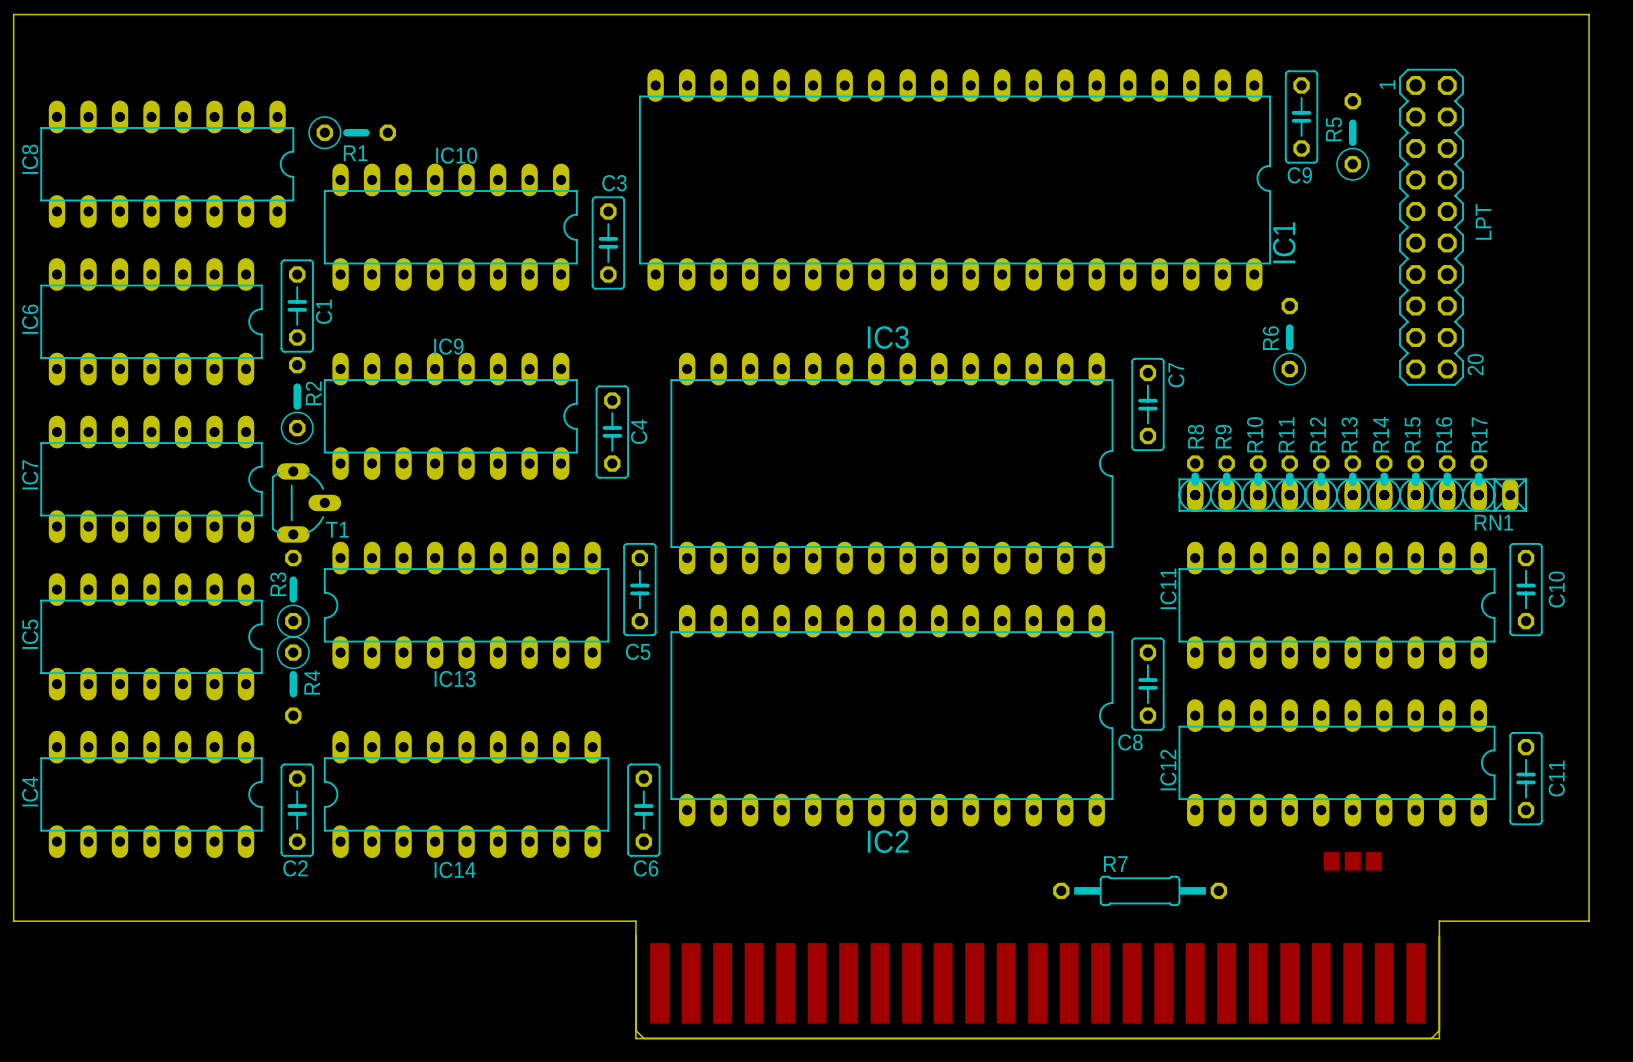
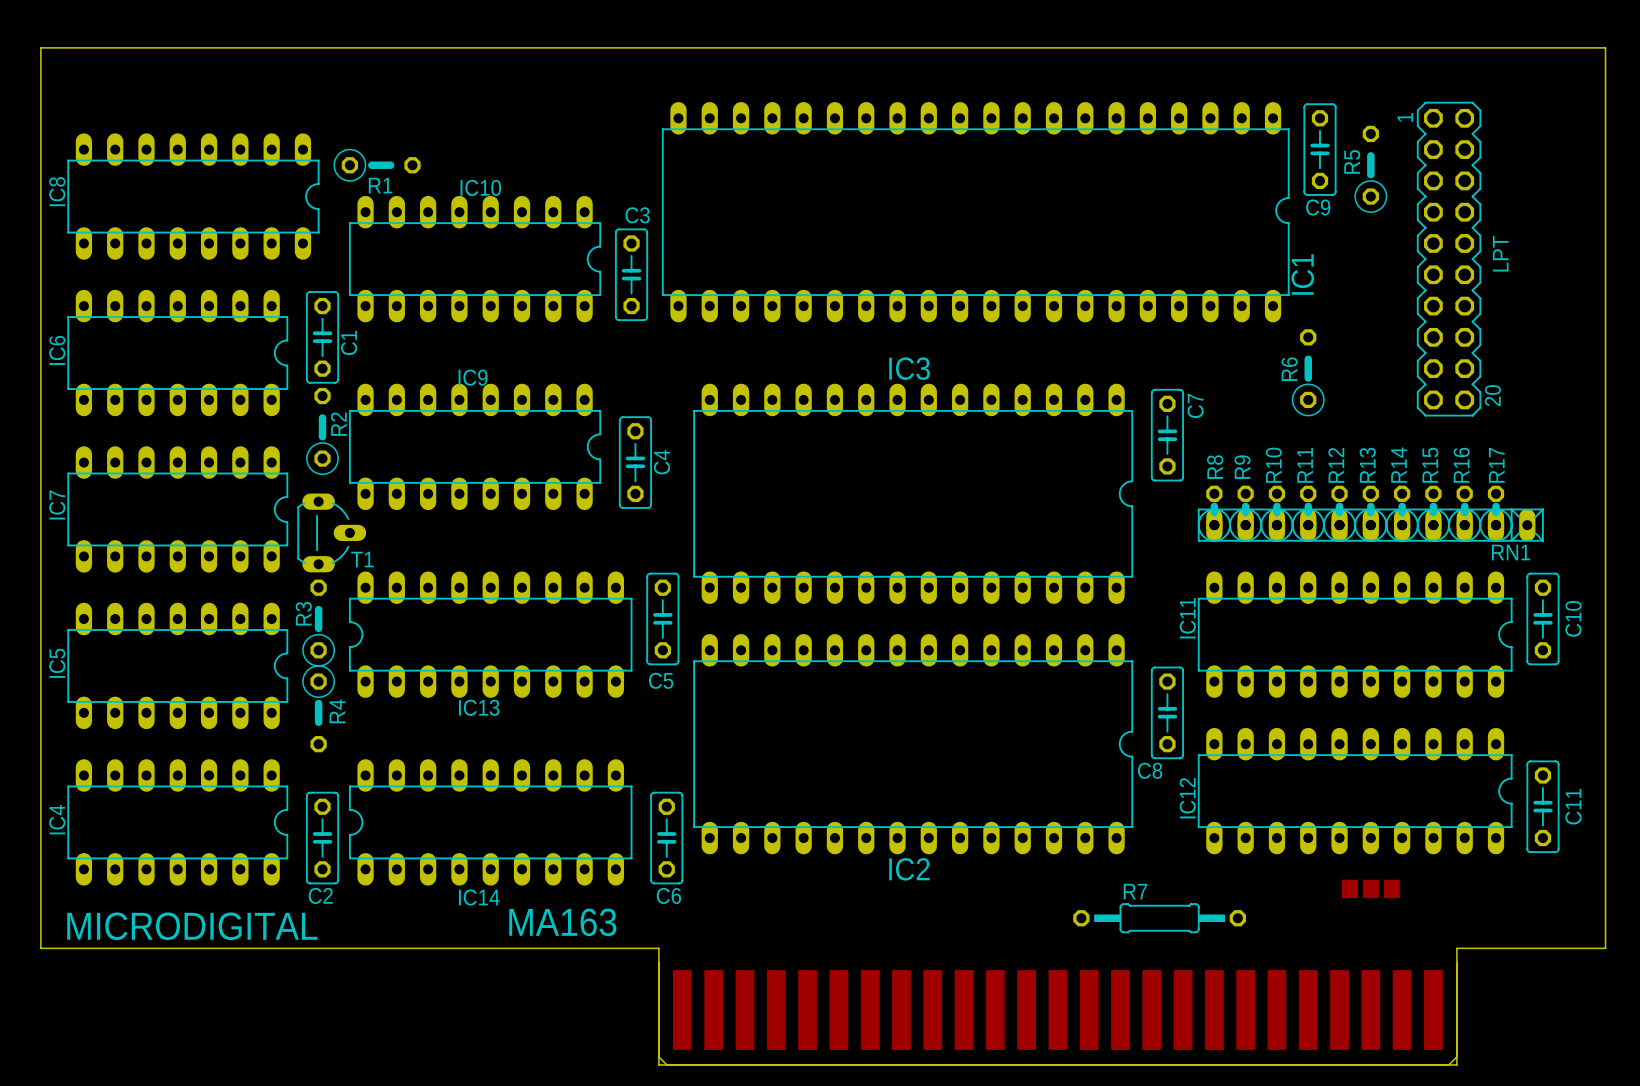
text: none -> MA163 (562, 922)
text: none -> MICRODIGITAL (192, 926)

